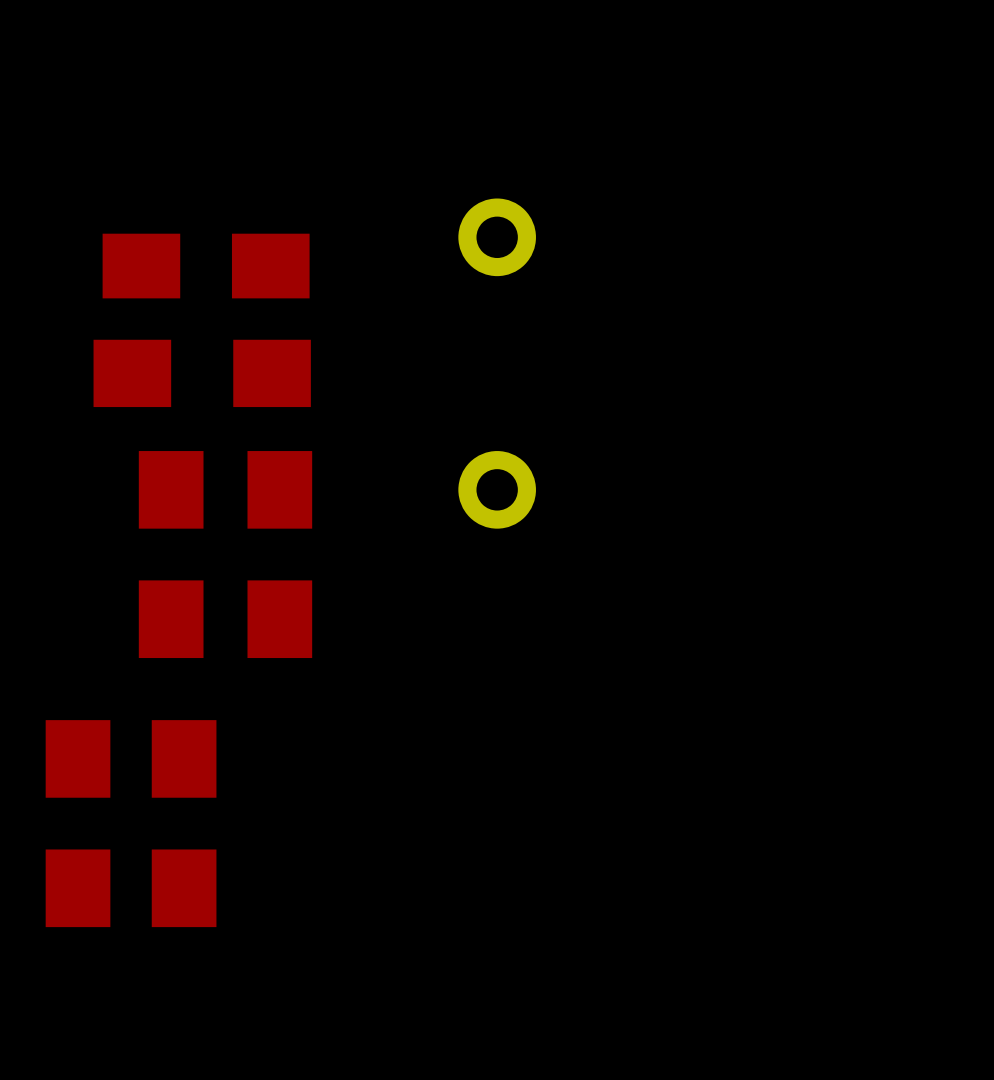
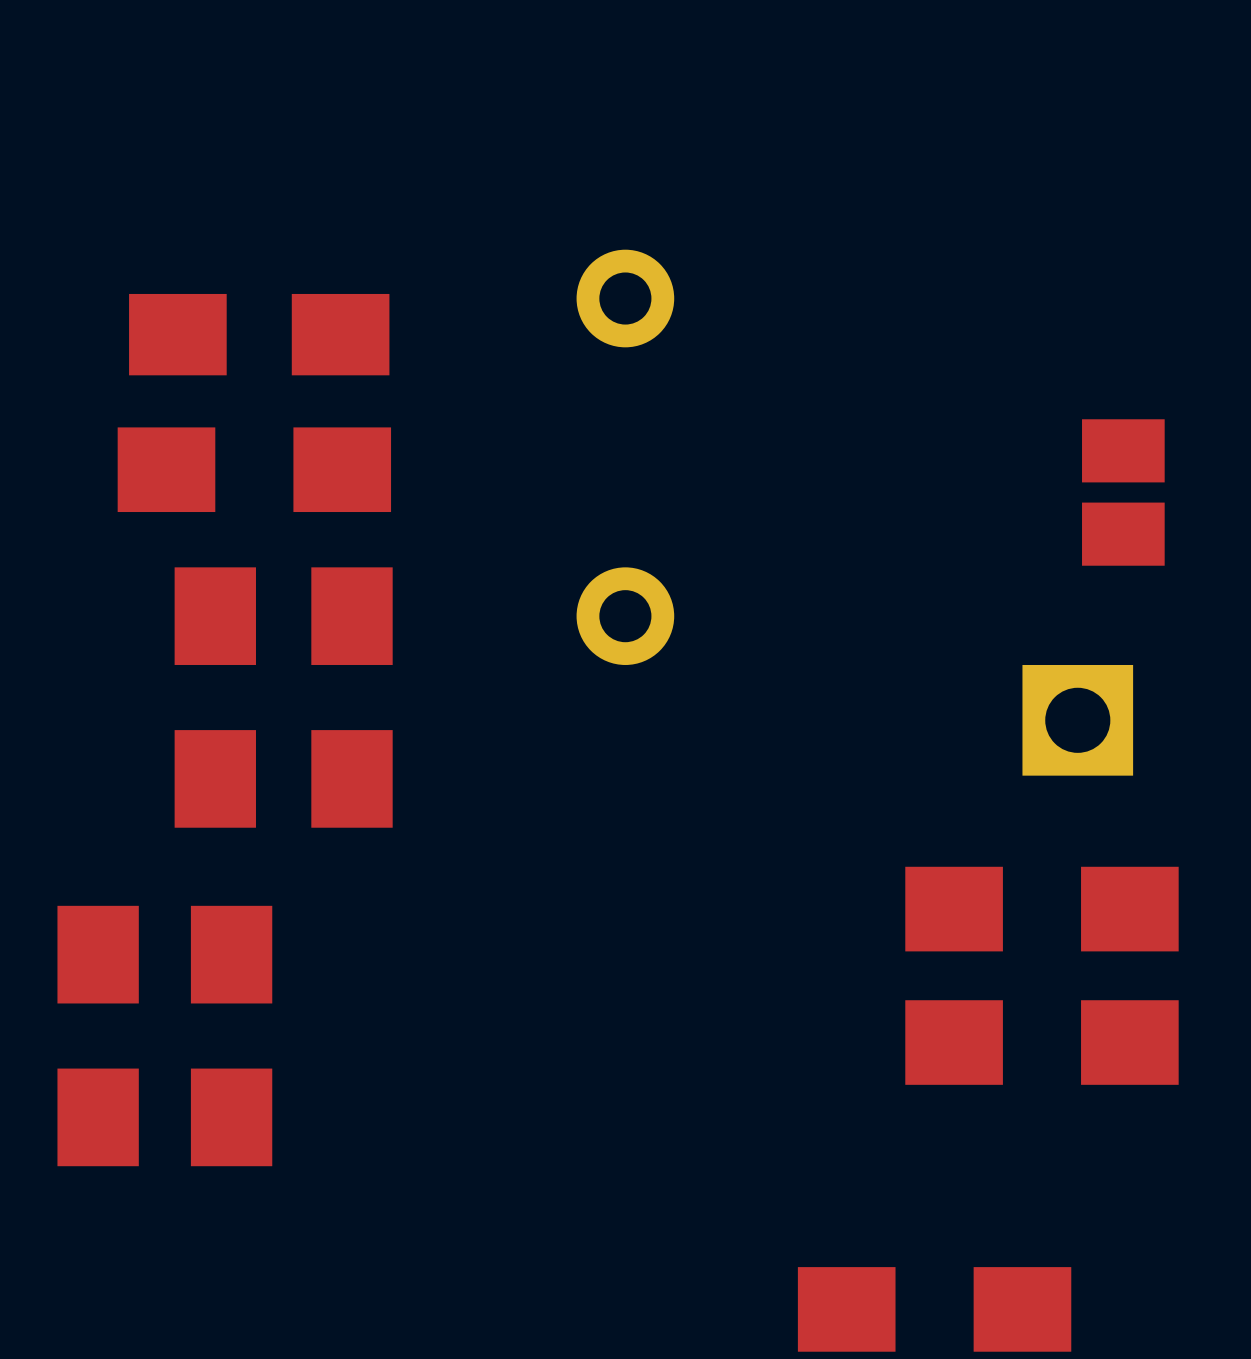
part: none -> (1123, 492)
part: none -> (1077, 720)
part: none -> (1041, 909)
part: none -> (1041, 1042)
part: none -> (934, 1309)

